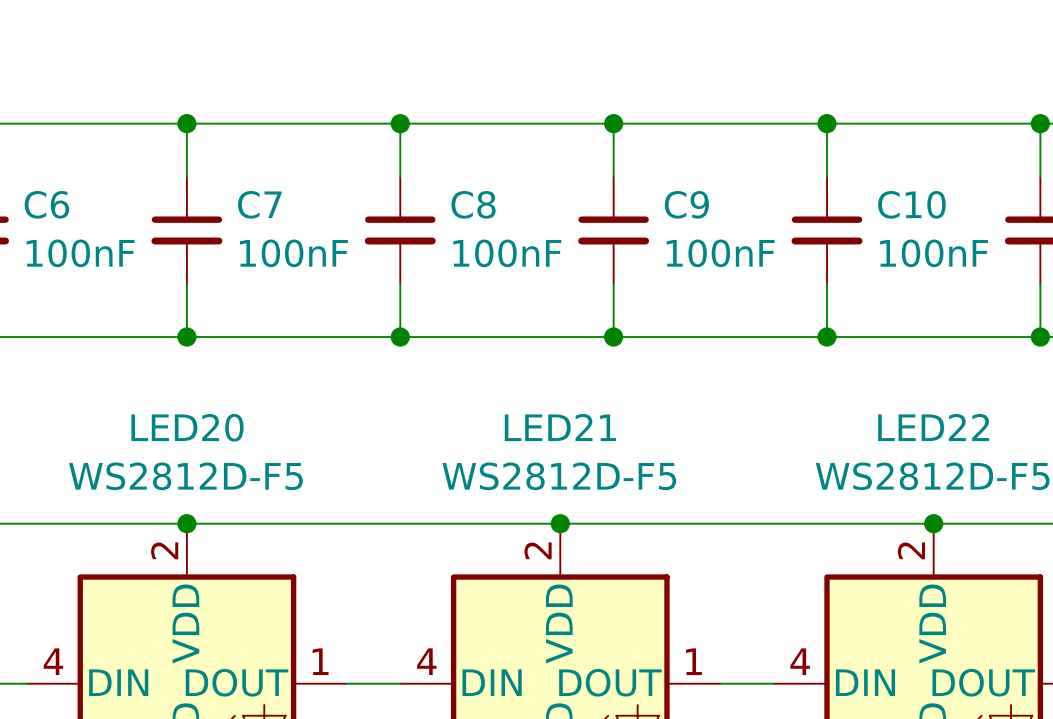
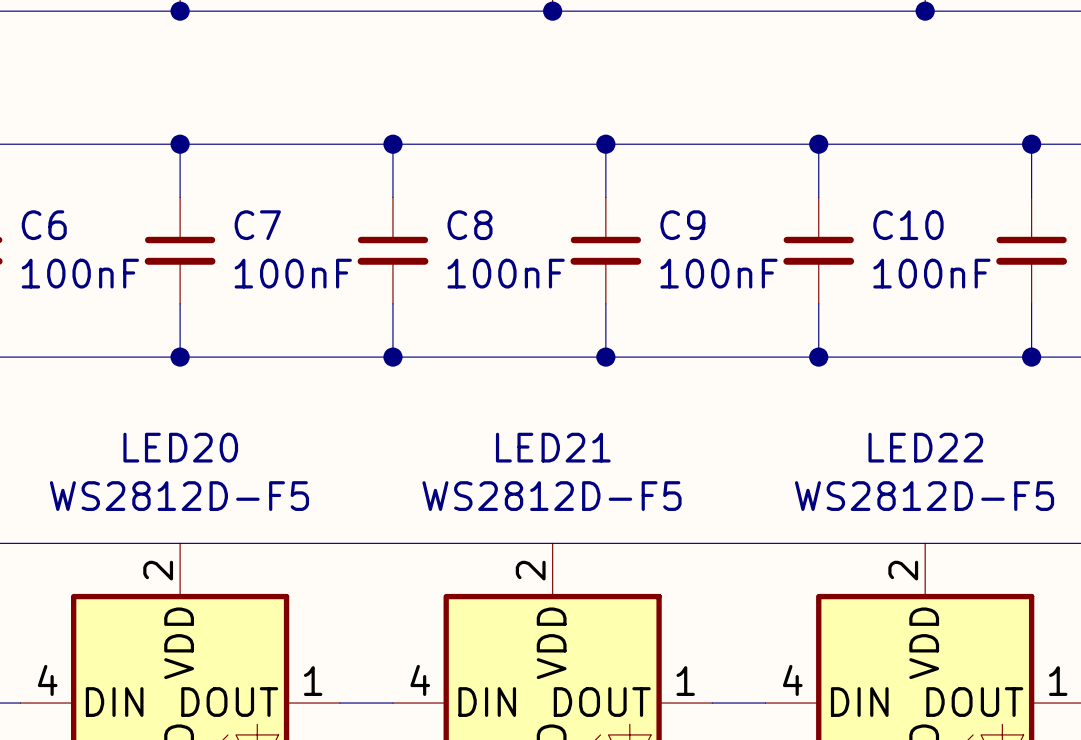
junction: (186, 523) -> none
junction: (560, 523) -> none
junction: (933, 523) -> none

